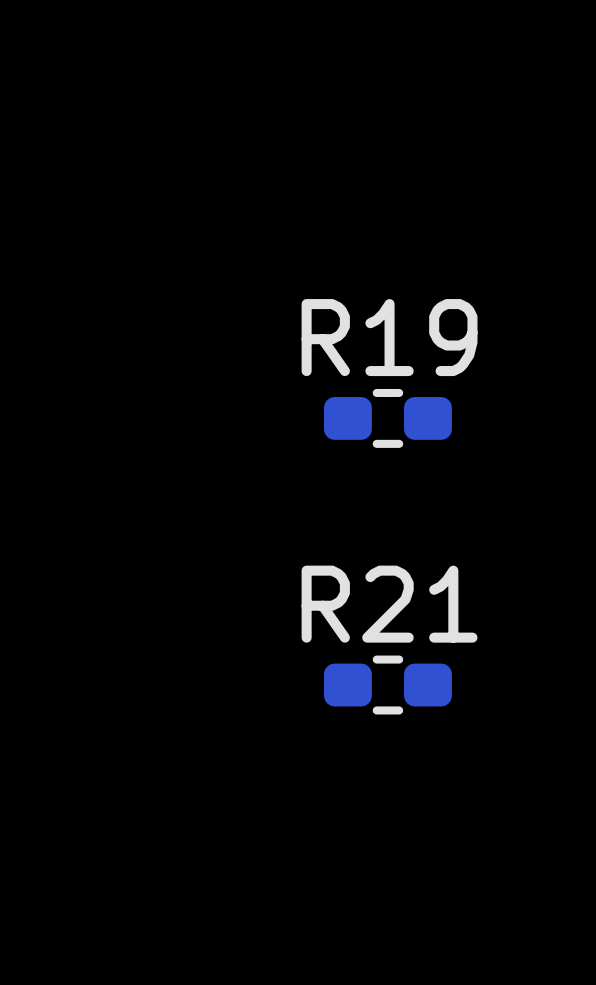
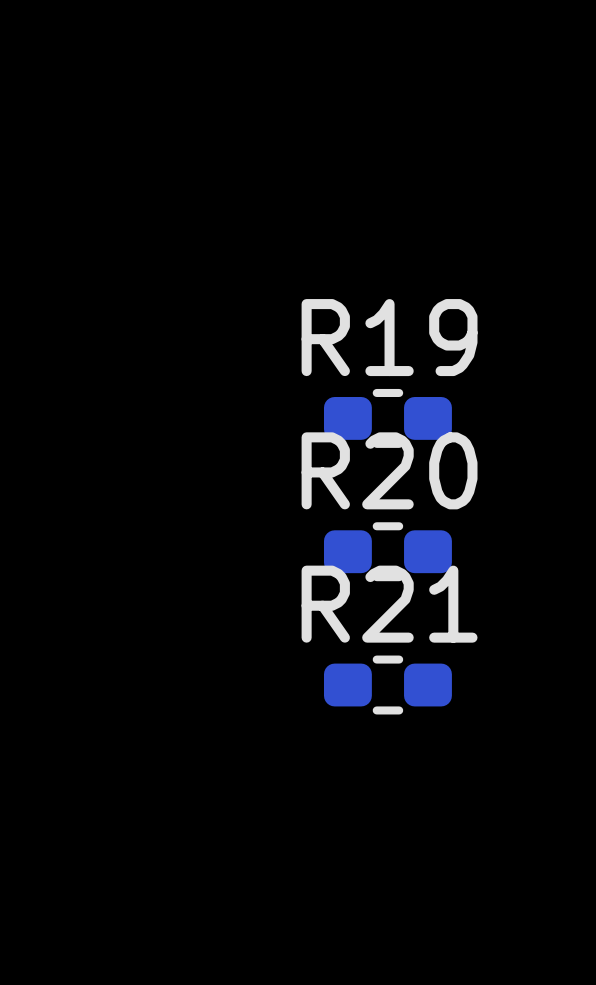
R20: none -> (387, 551)

